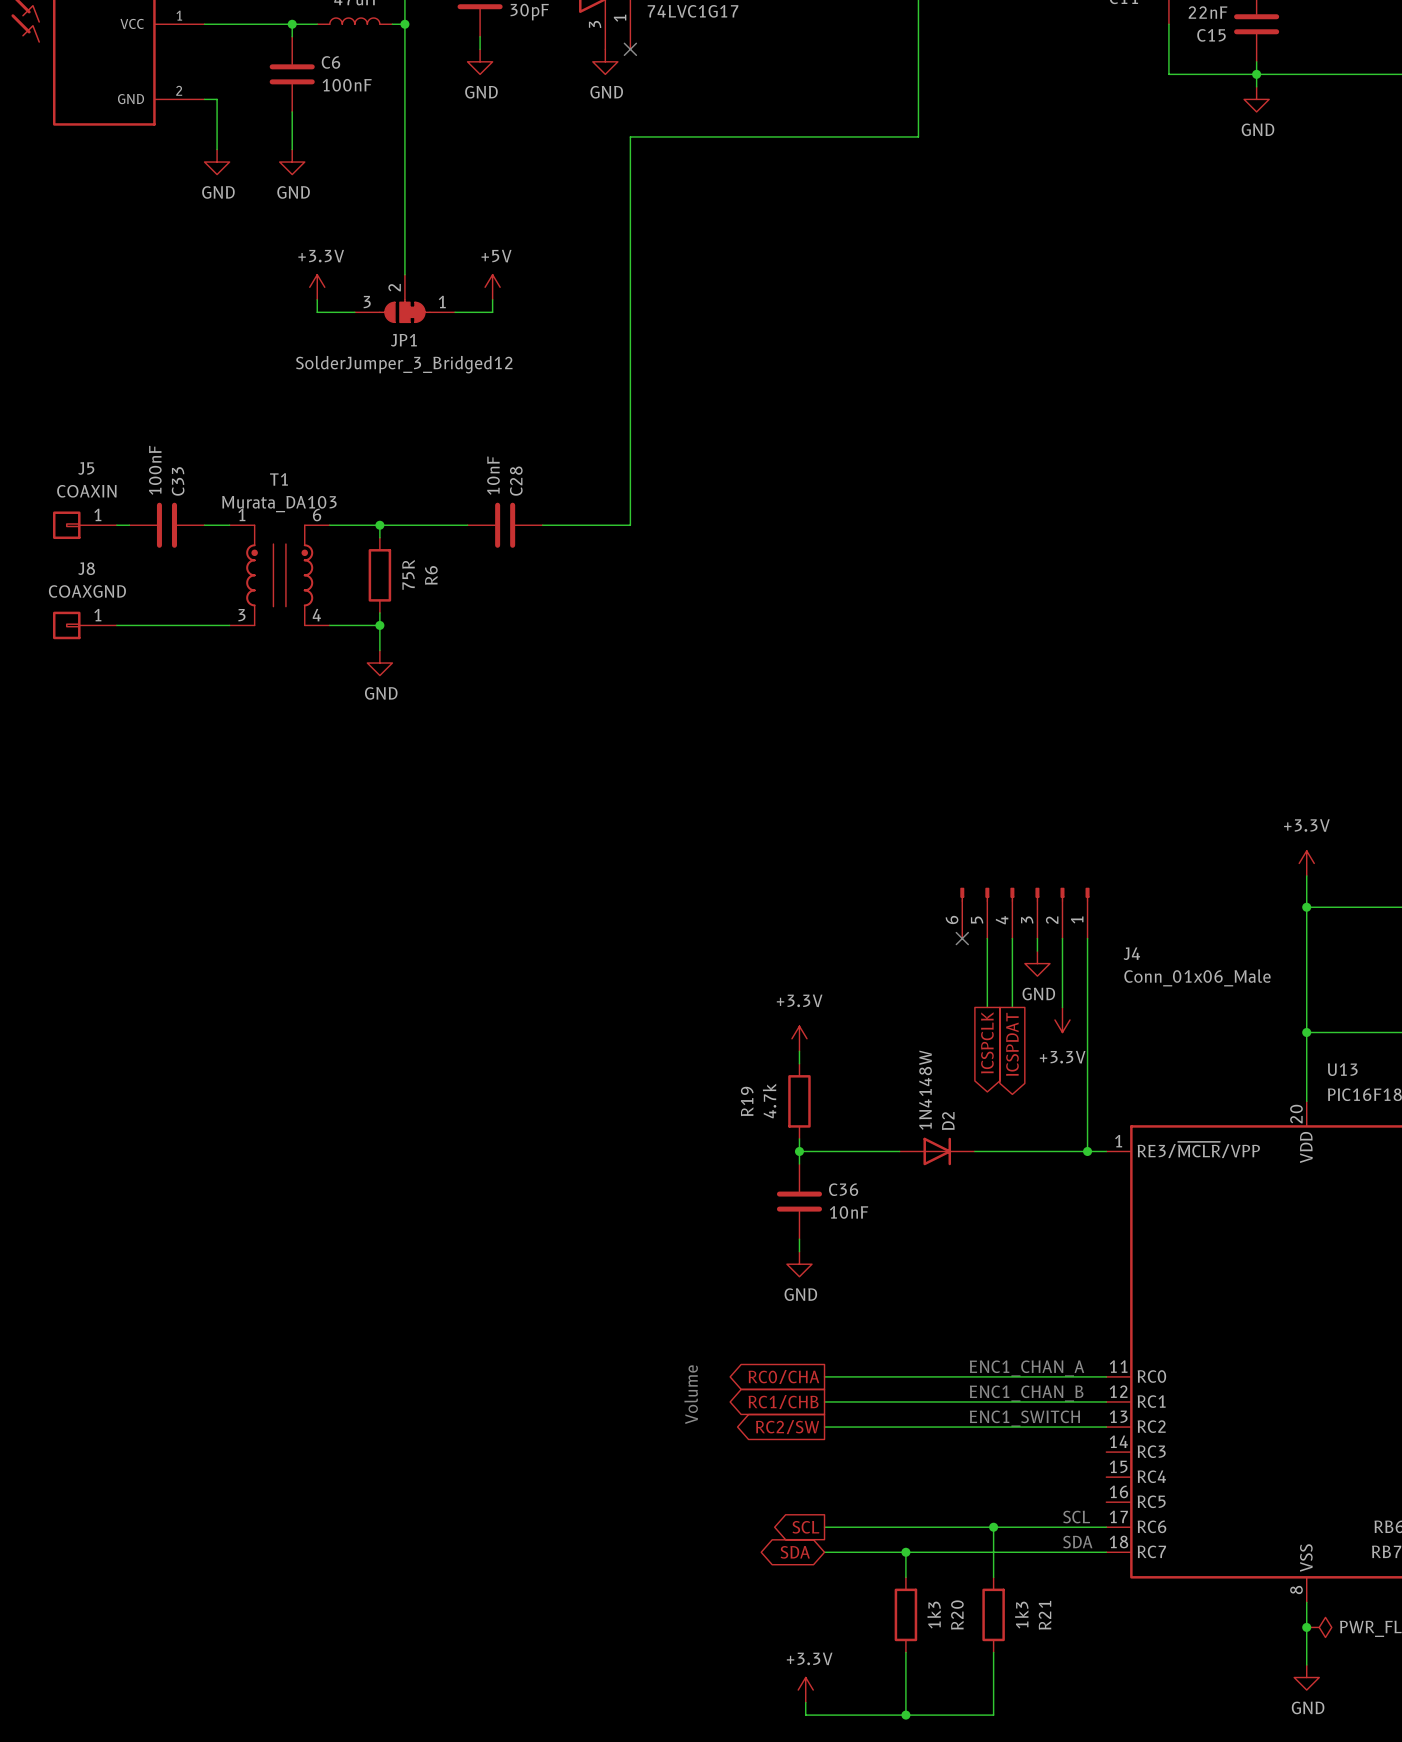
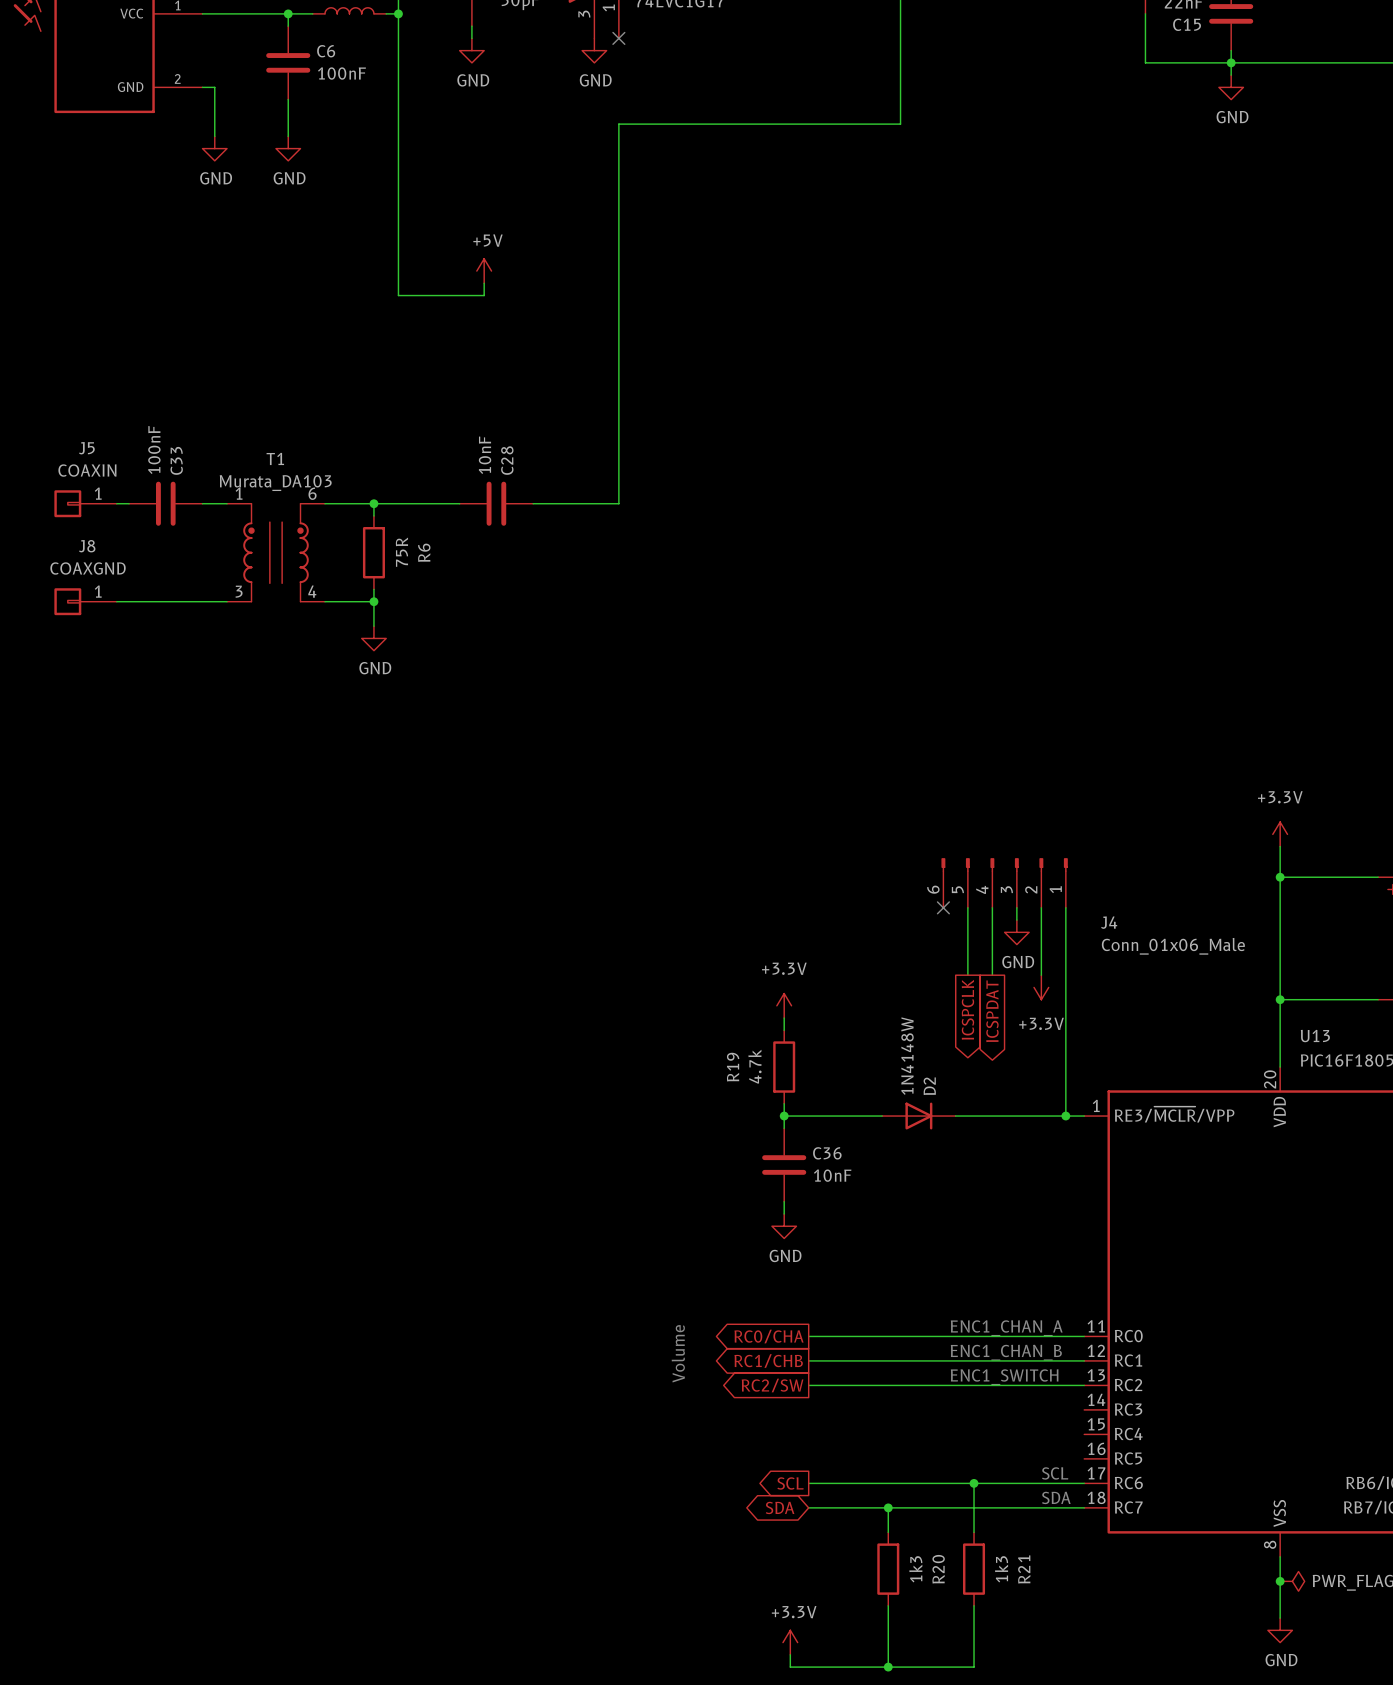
power symbol: +3.3V (317, 287) -> none
JP1: SolderJumper_3_Bridged12 (404, 298) -> none
wire: (317, 299) (317, 312) (354, 312) -> none

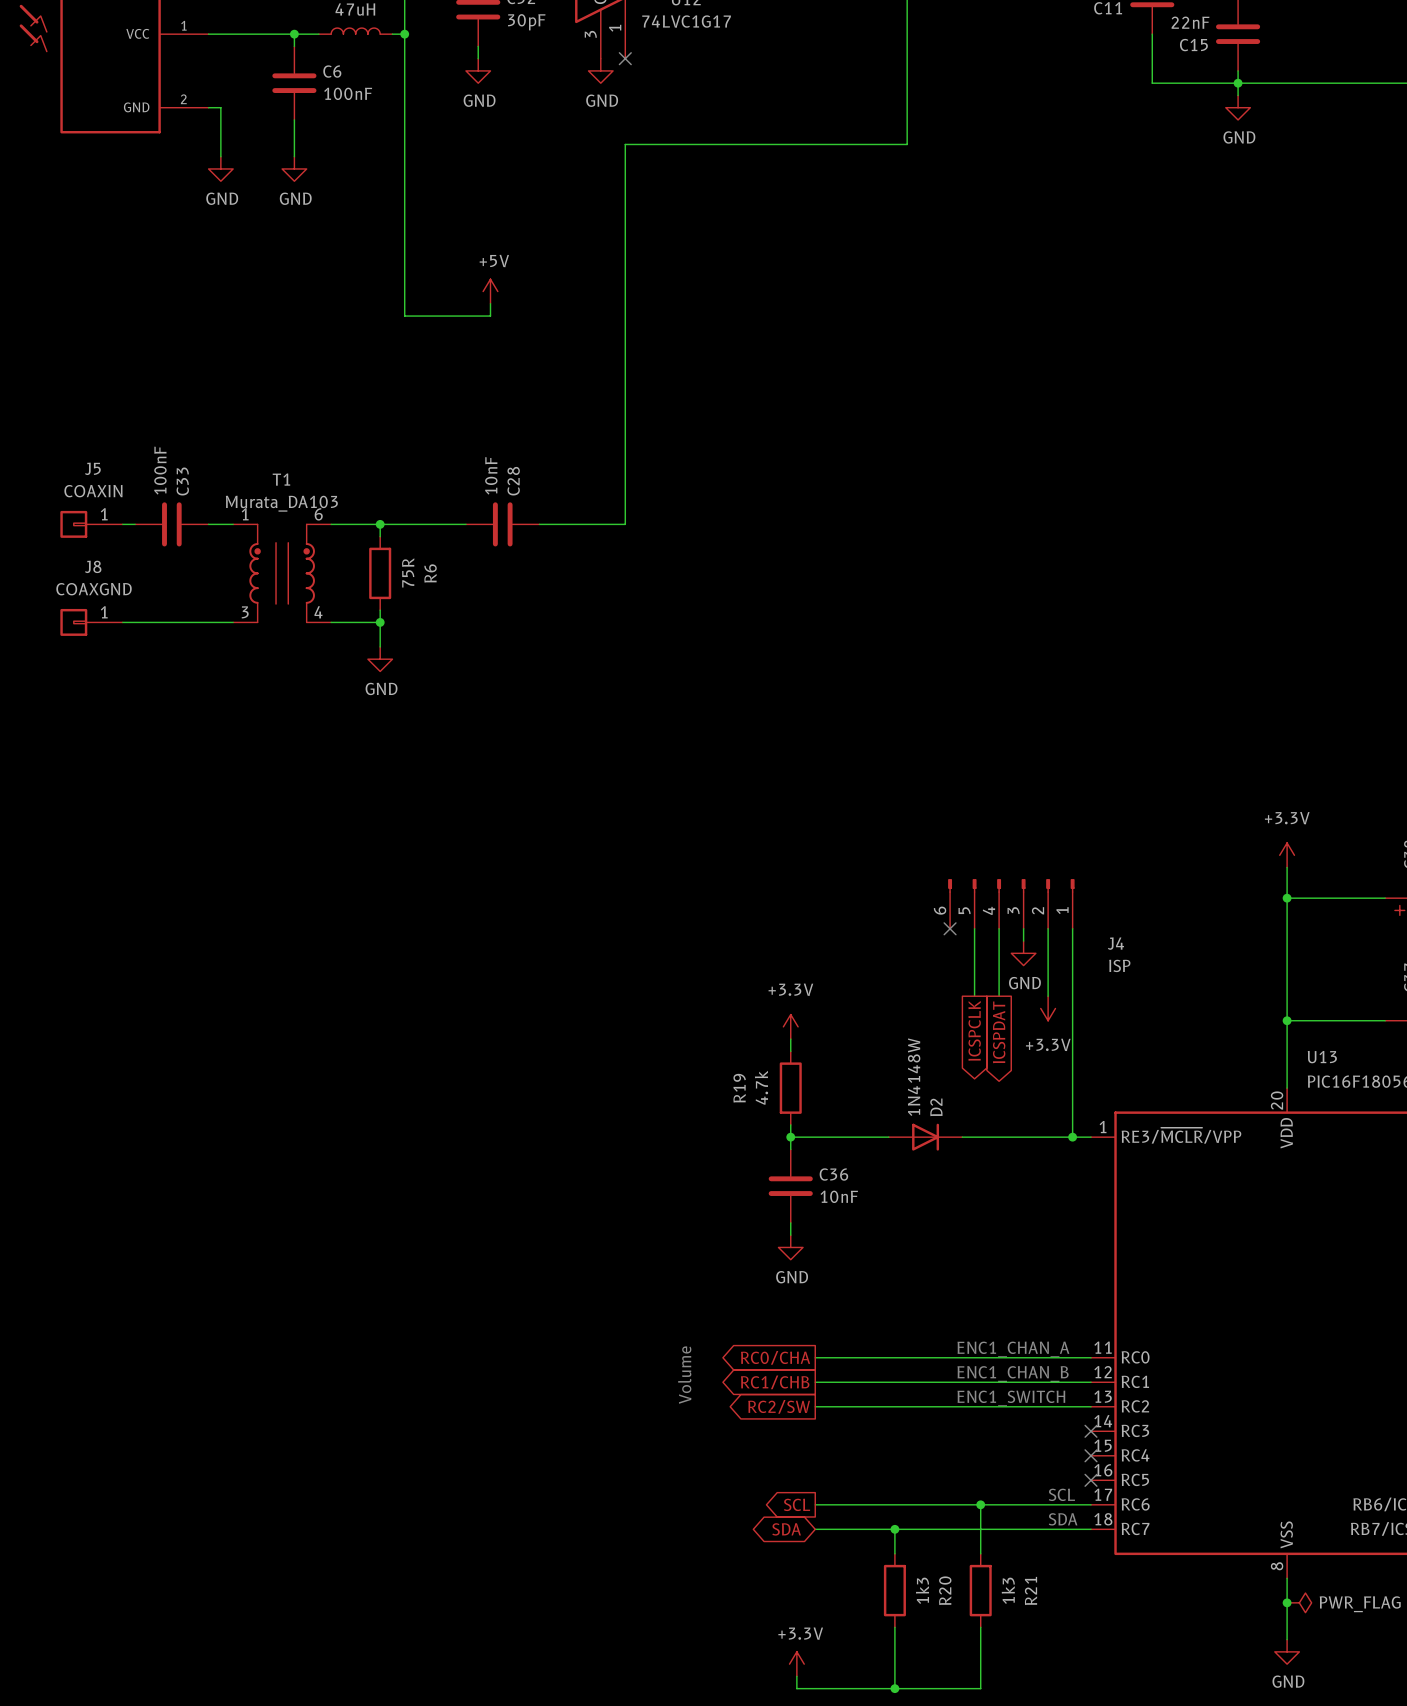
J4 value: Conn_01x06_Male (1173, 946) -> ISP (1119, 965)
no-connect mark: none -> (1091, 1431)
no-connect mark: none -> (1091, 1455)
no-connect mark: none -> (1091, 1480)

